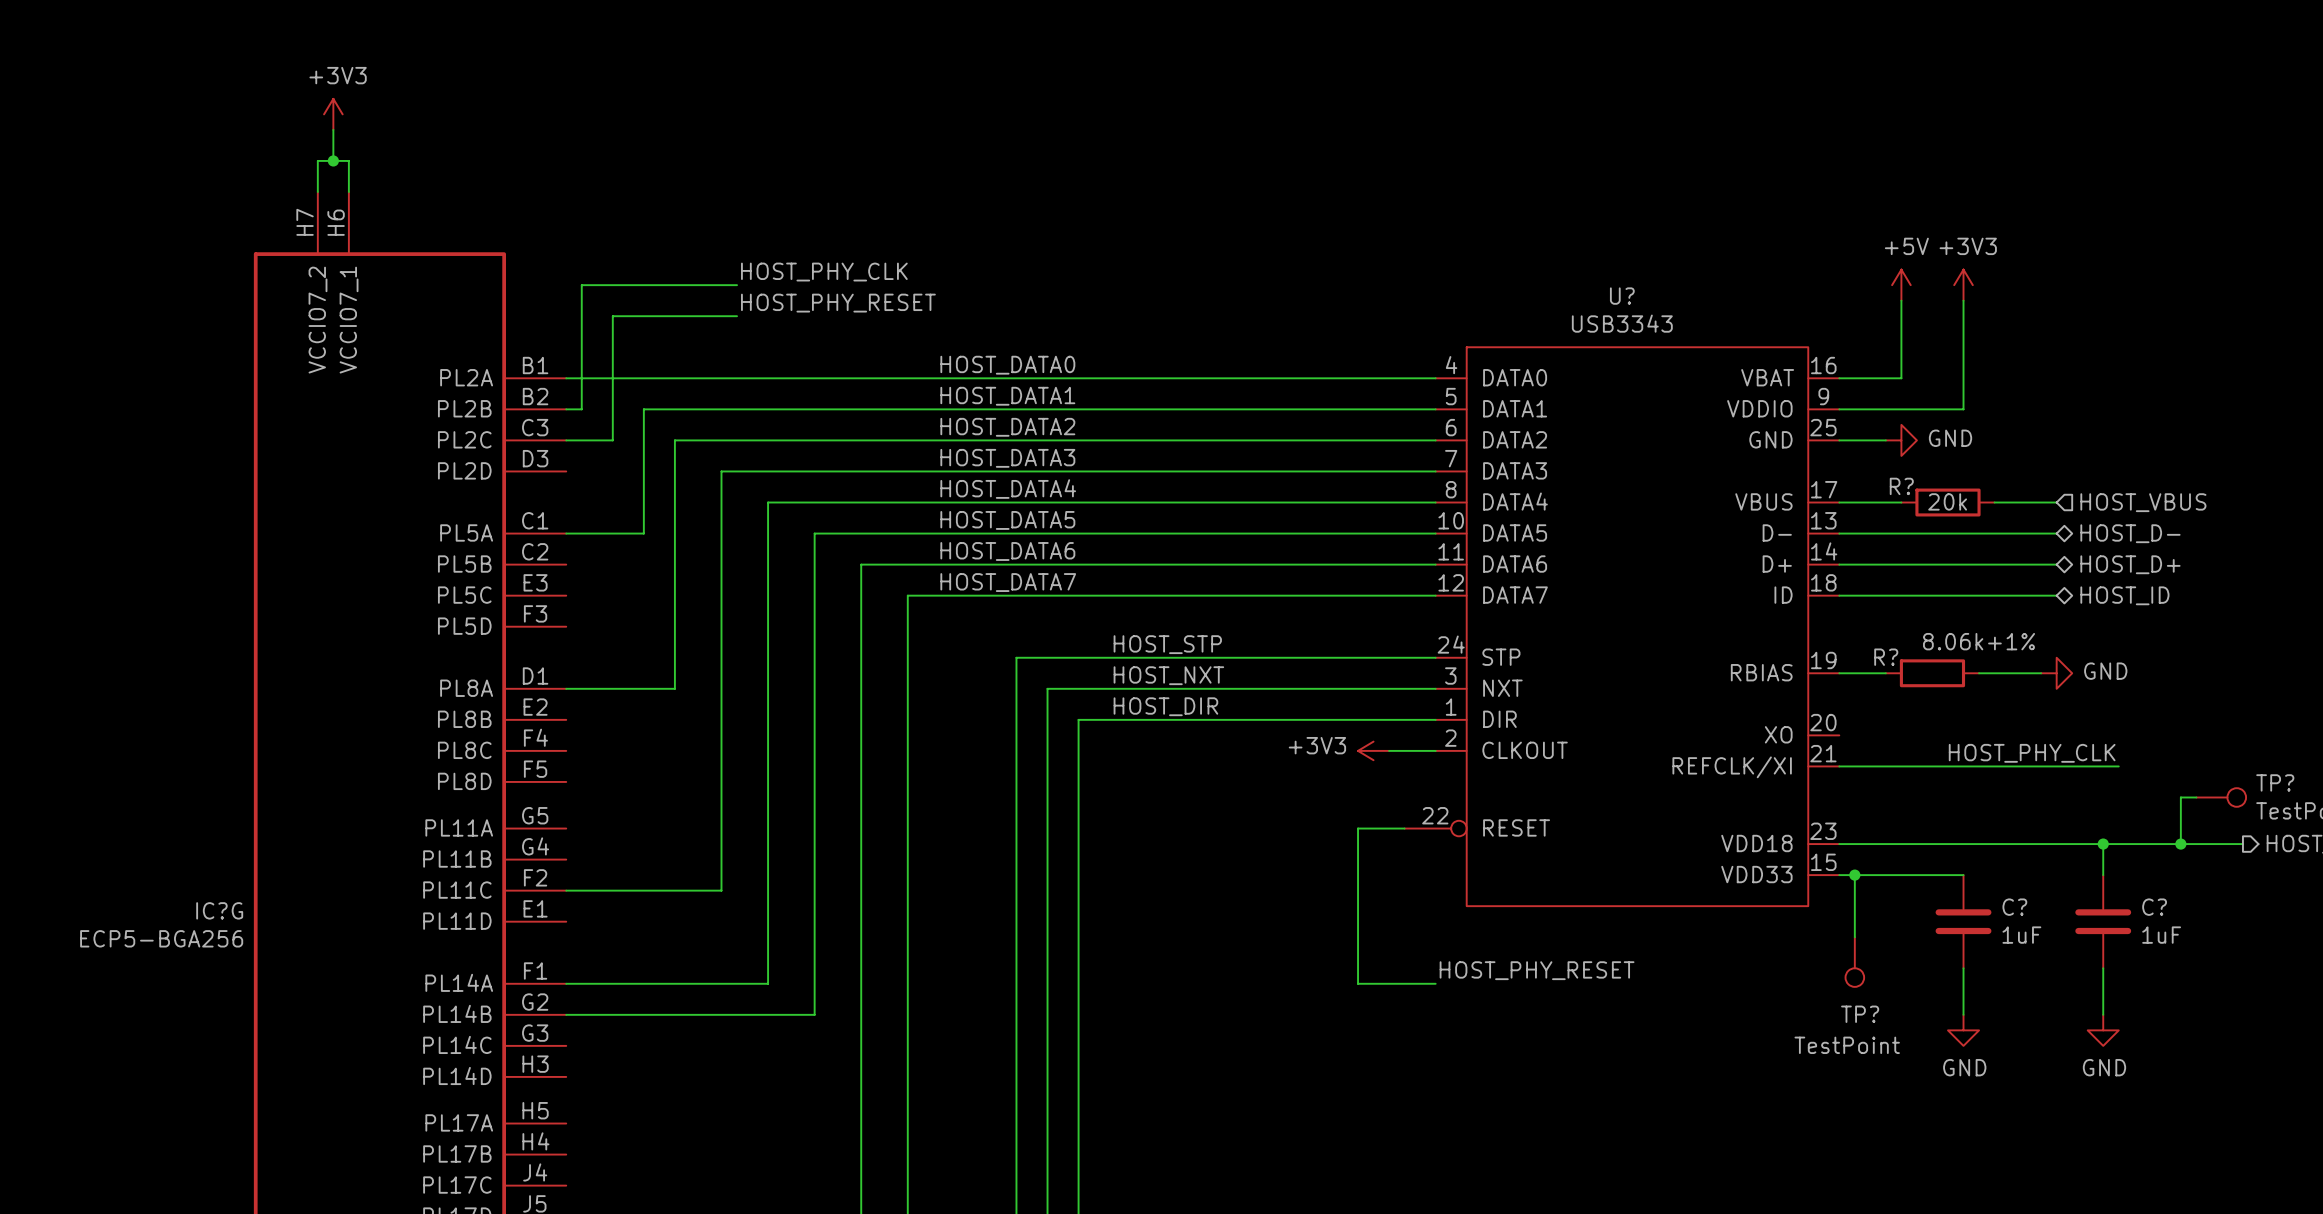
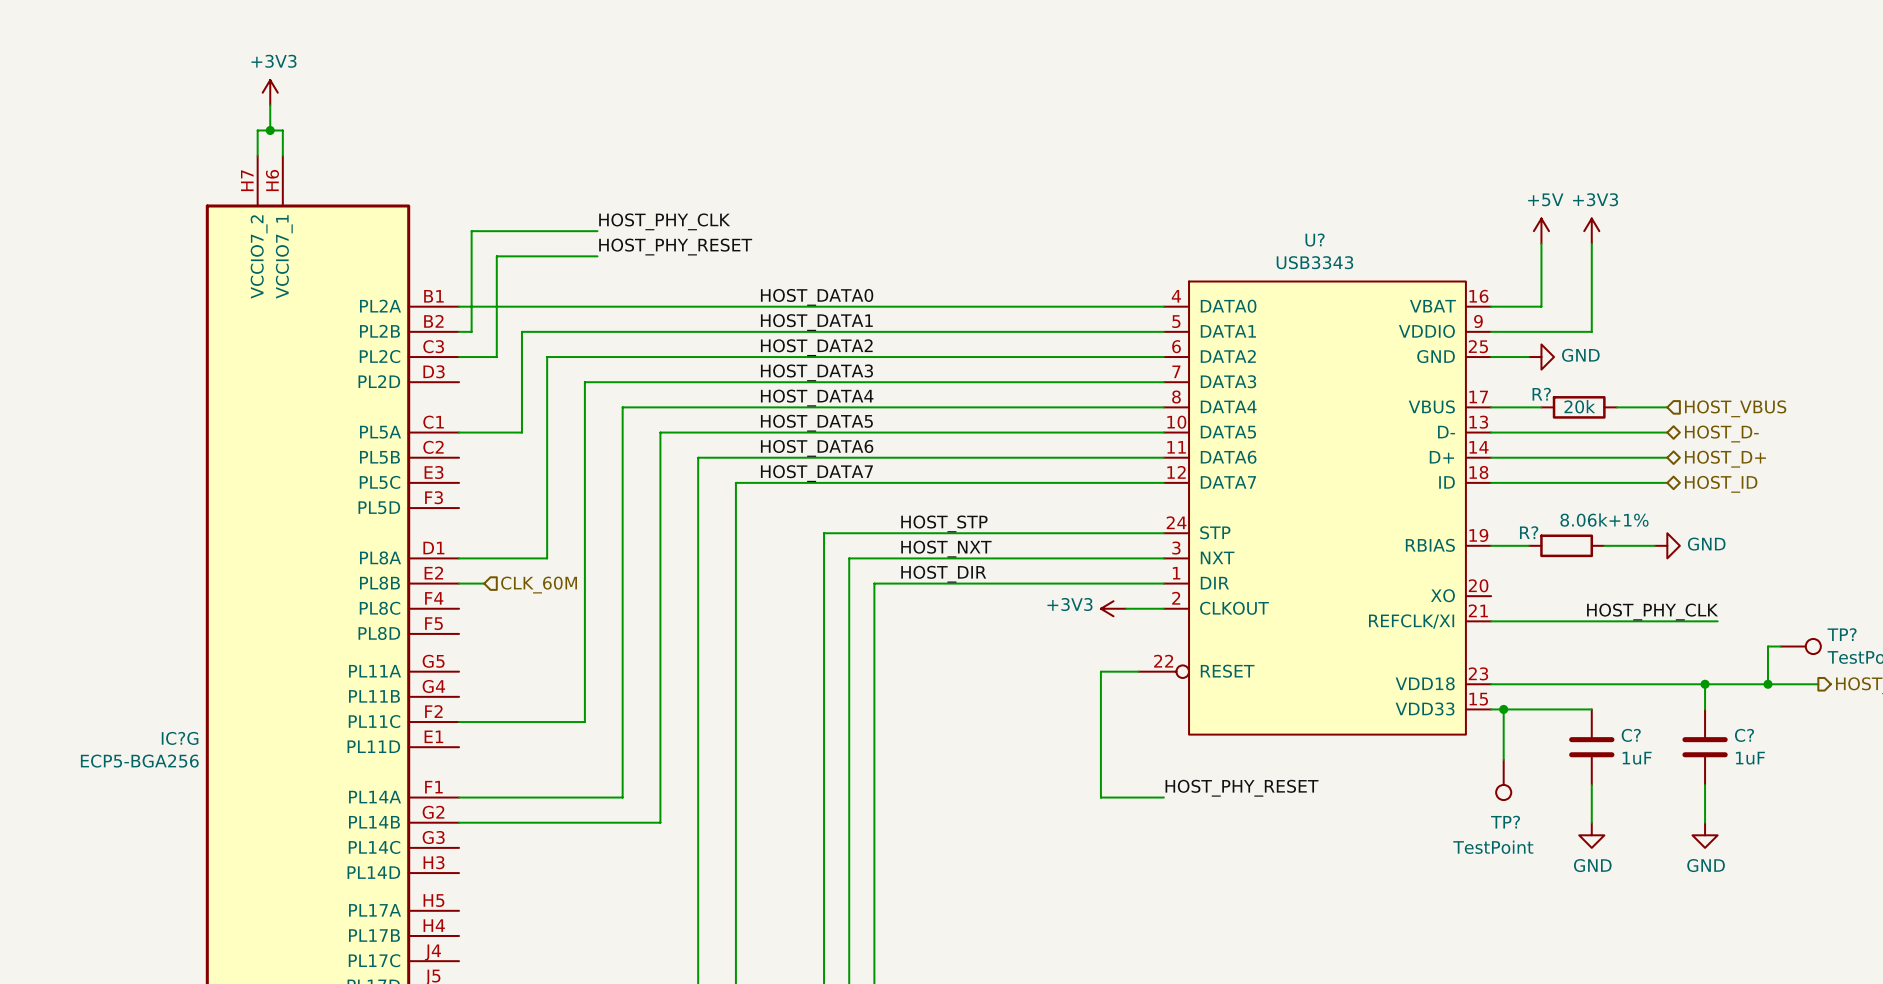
wire: none -> (459, 583) (484, 583)
hierarchical label: none -> CLK_60M (539, 585)

